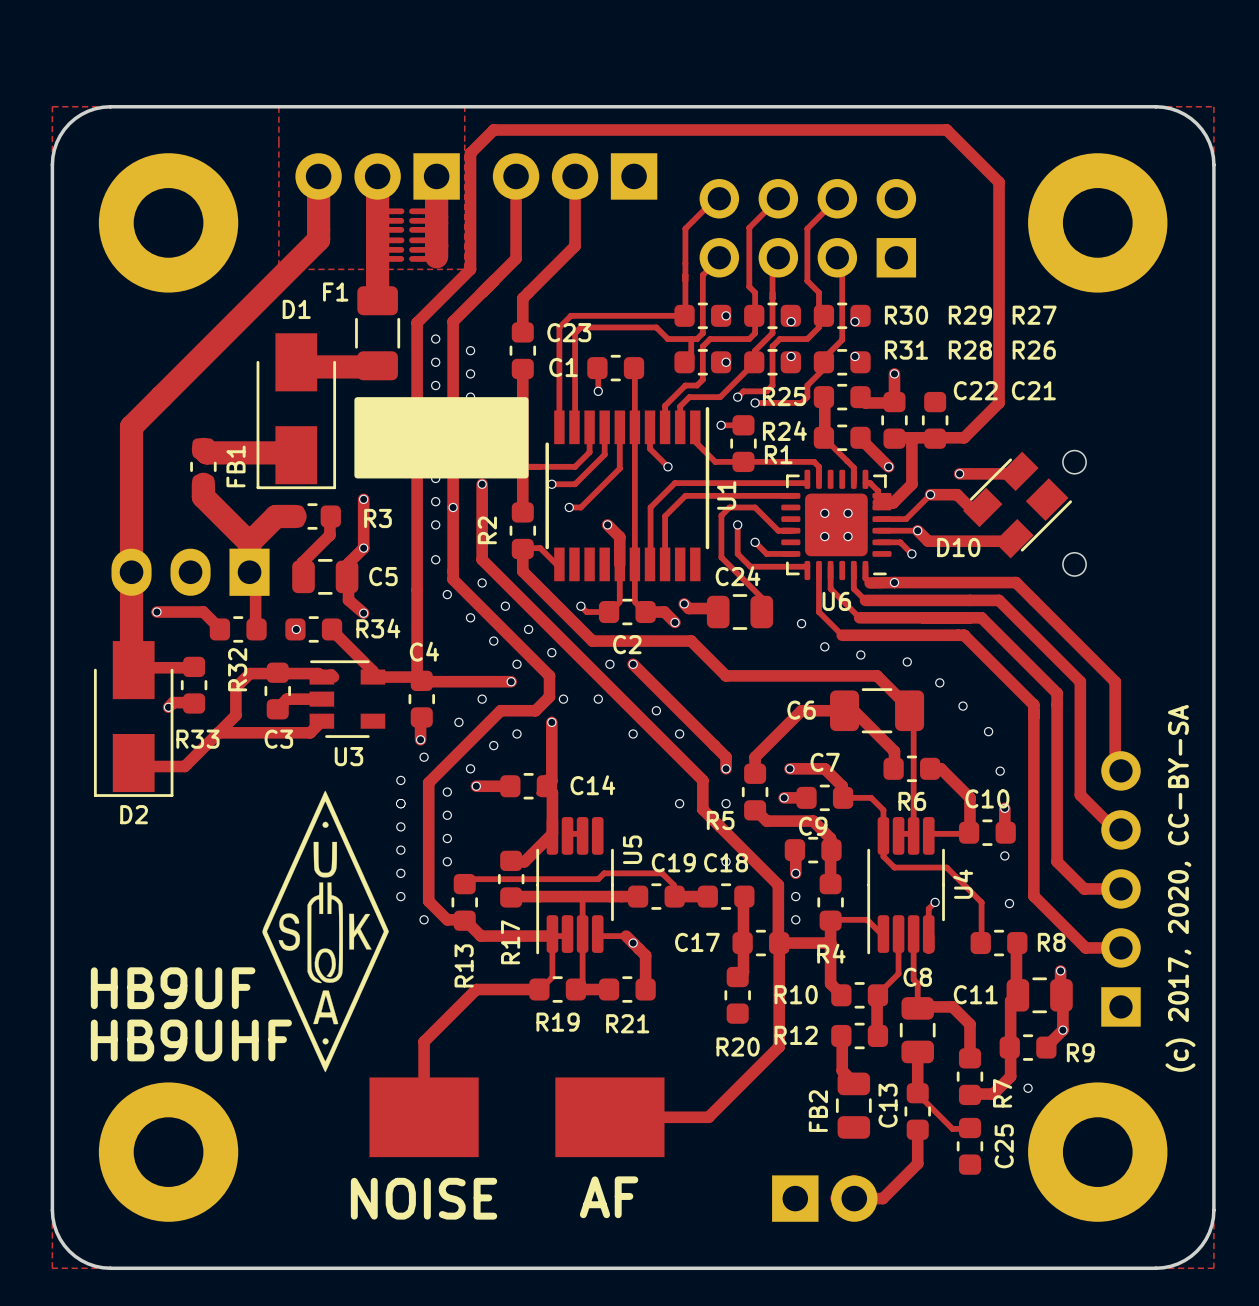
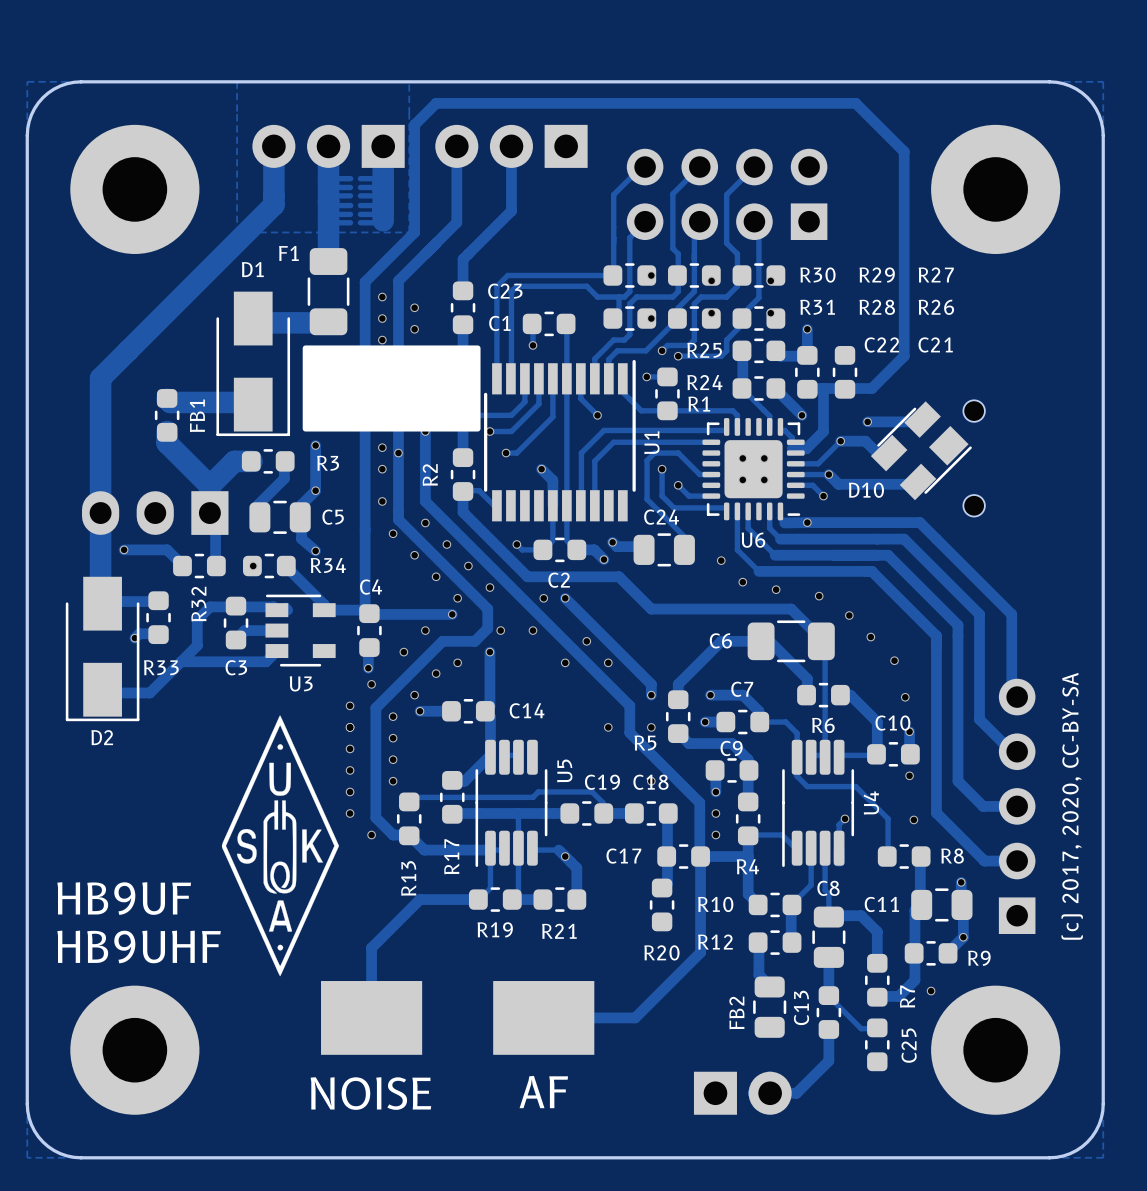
drawing shape: [354, 397, 529, 479] -> [302, 345, 481, 432]

